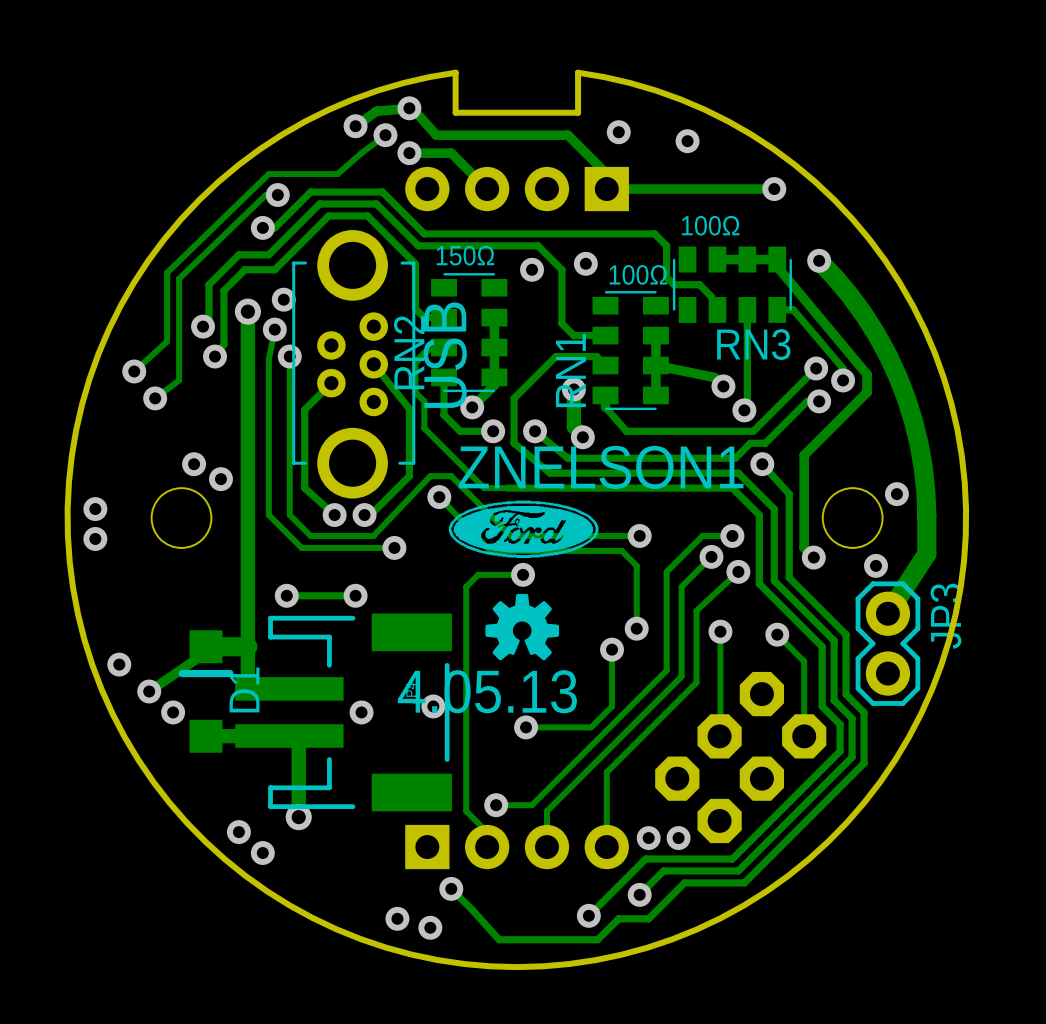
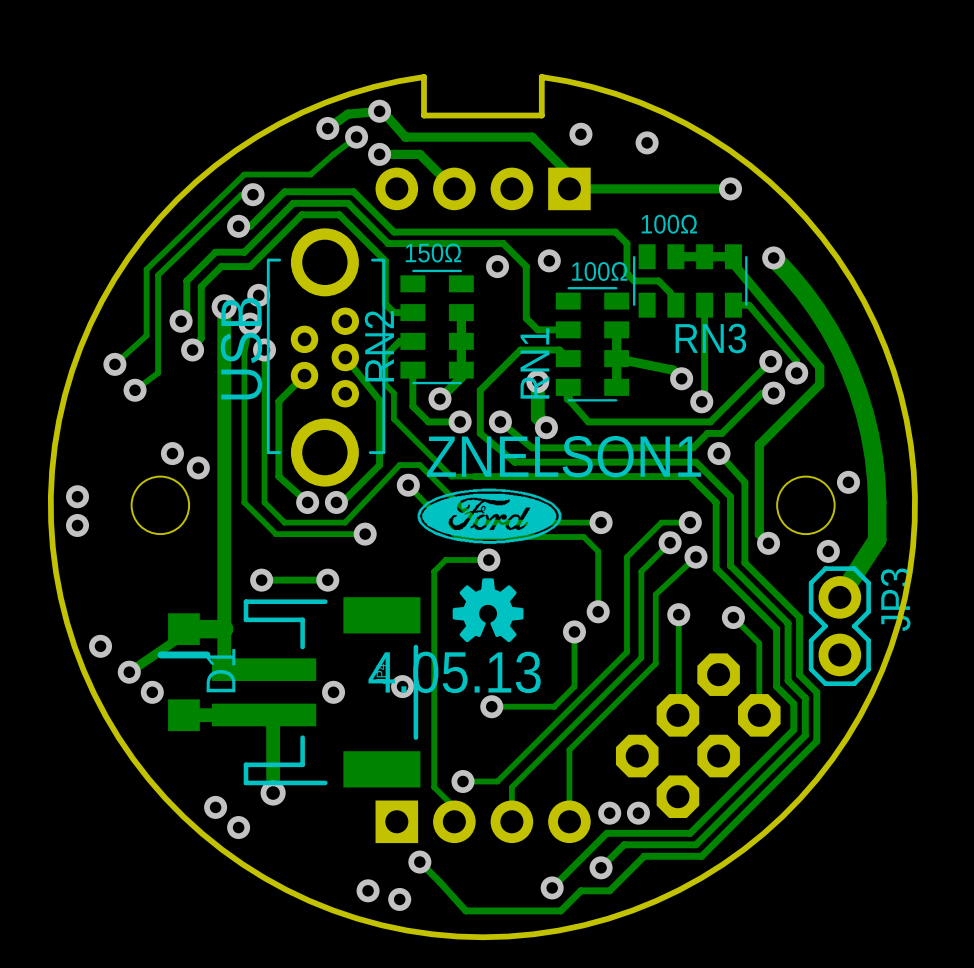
part text position: USB (445, 355) -> USB (241, 348)

